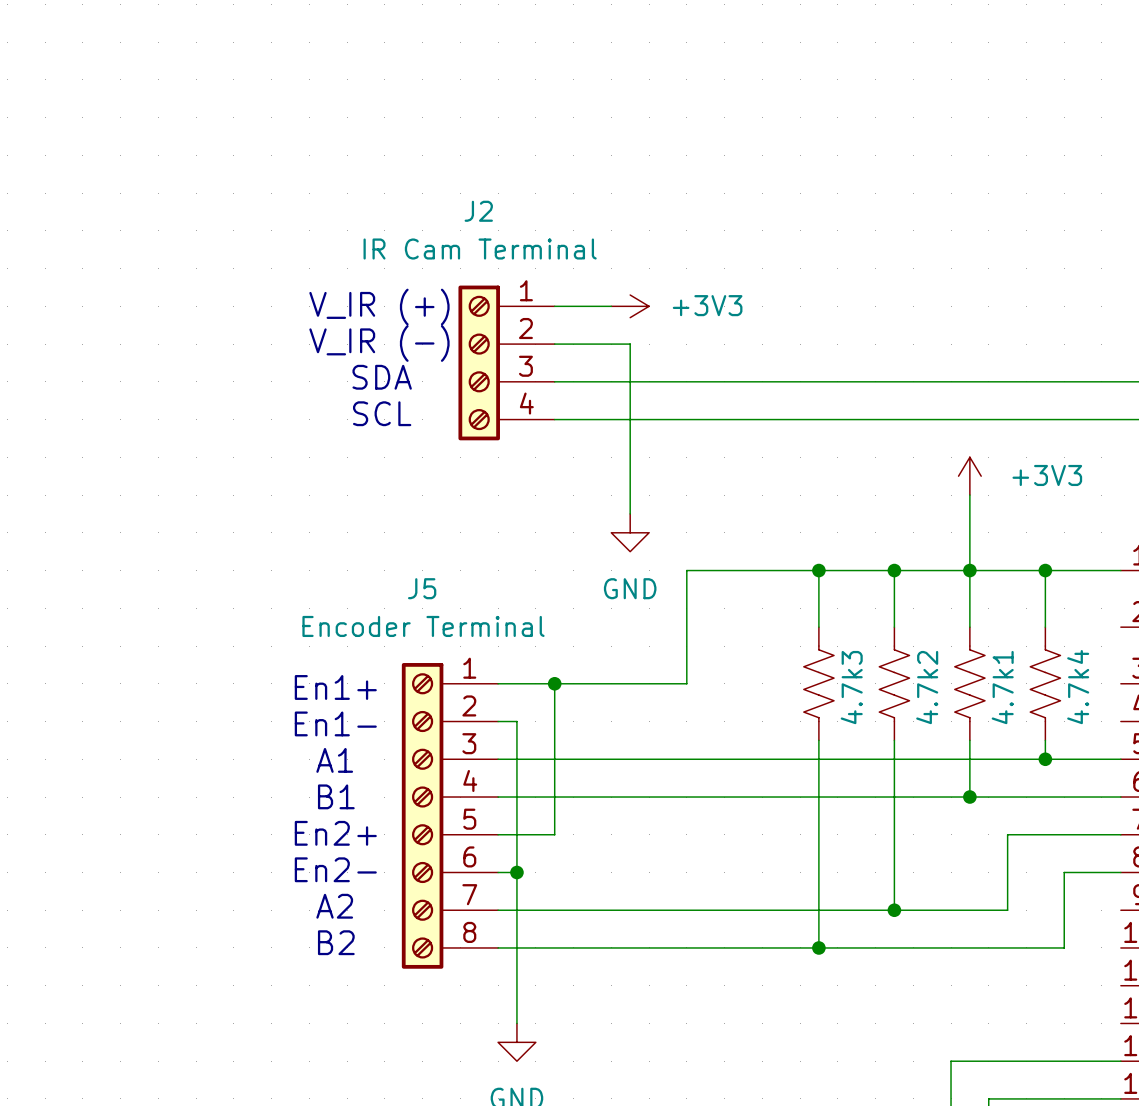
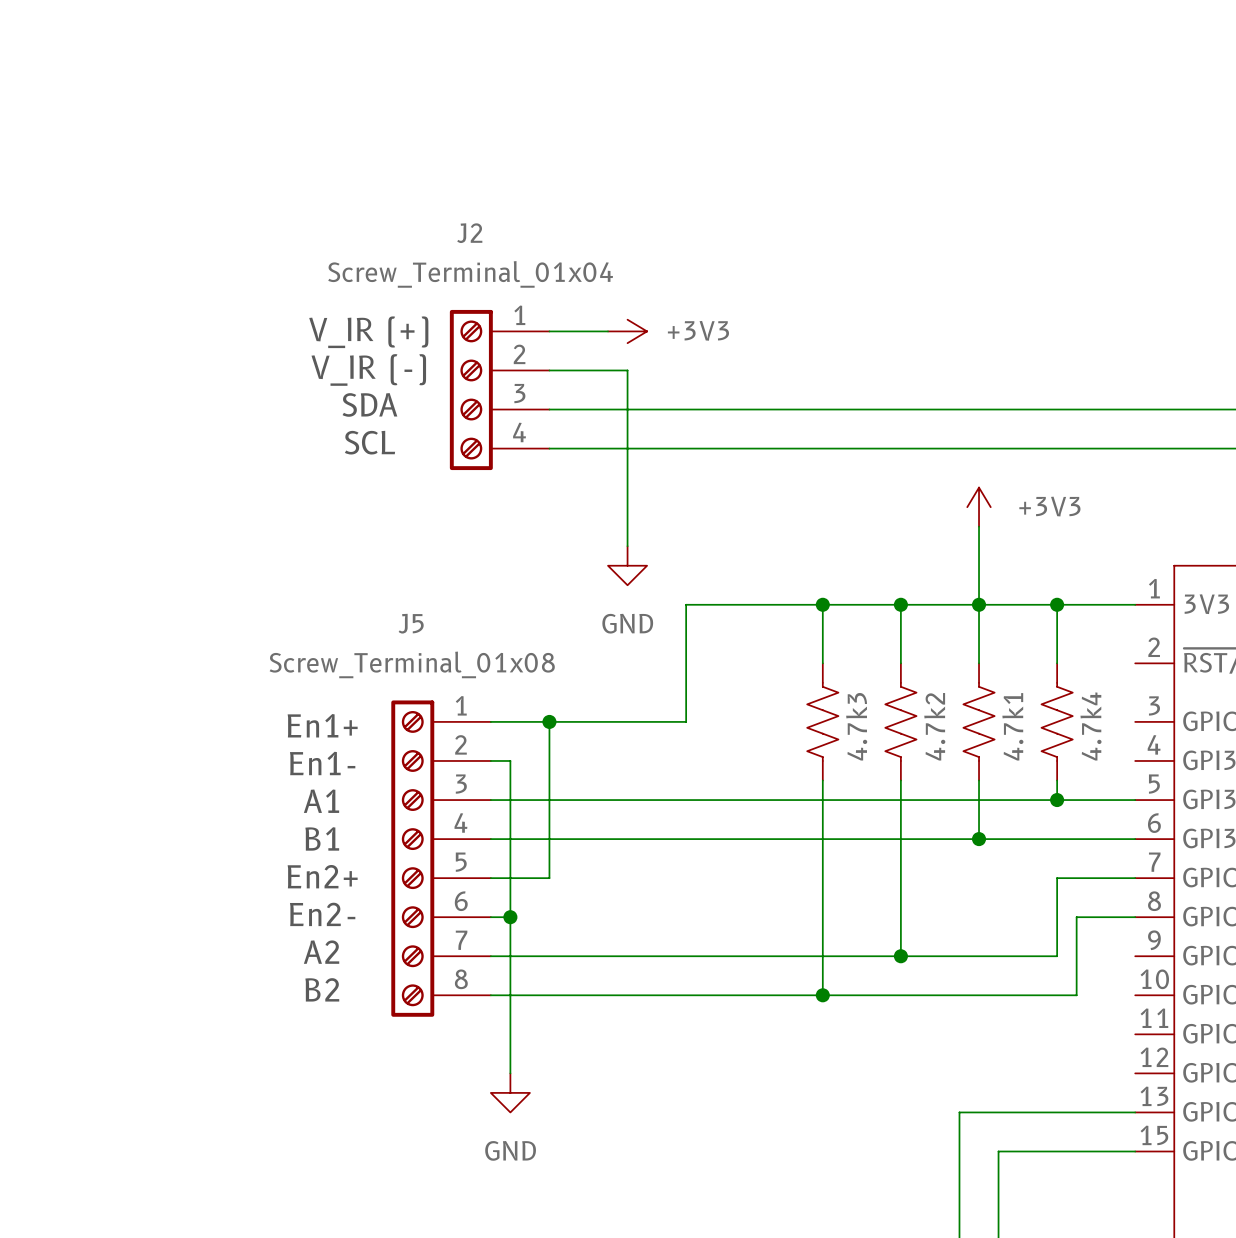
J2 value: IR Cam Terminal (480, 249) -> Screw_Terminal_01x04 (470, 274)
J5 value: Encoder Terminal (423, 626) -> Screw_Terminal_01x08 (412, 664)
wire: (1045, 834) (1007, 834) (1007, 910) -> (1057, 878) (1057, 956) (1018, 956)

